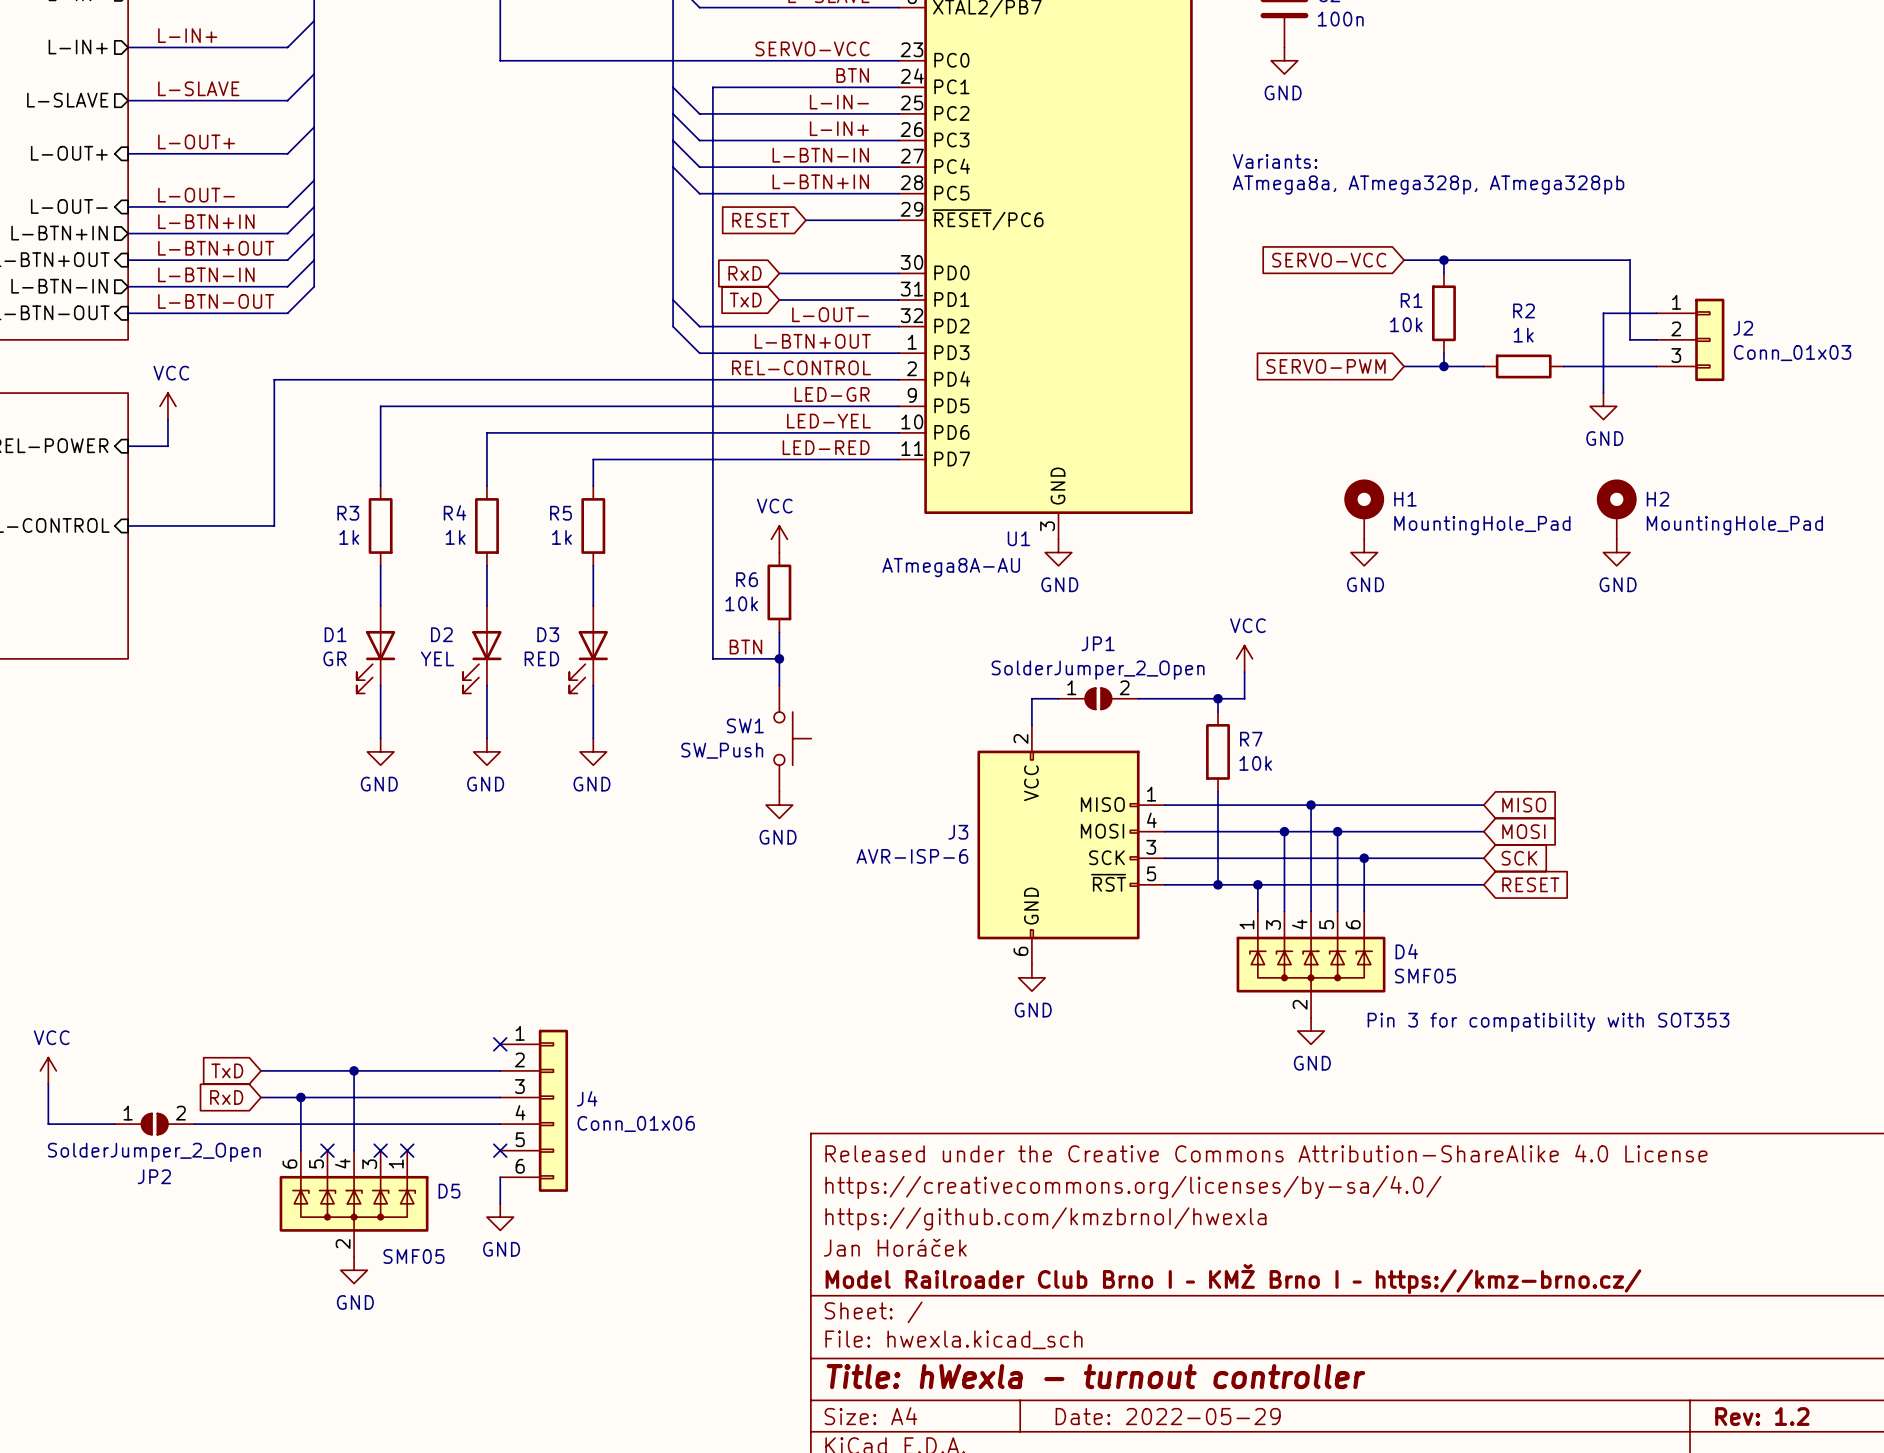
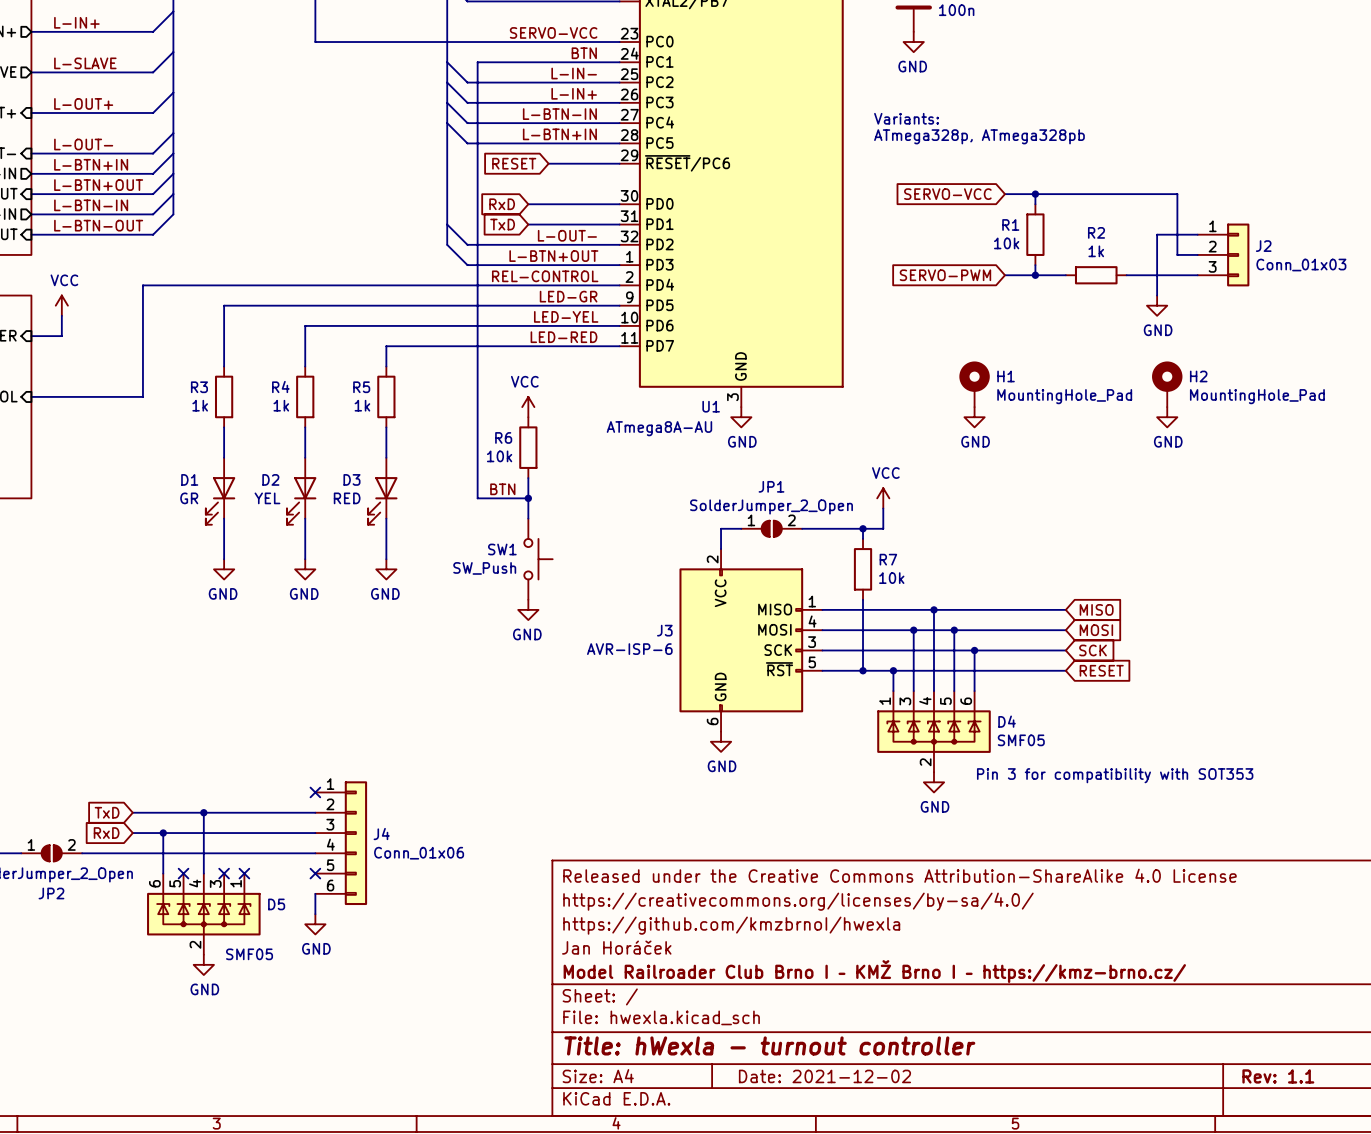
text: ATmega8a, ATmega328p, ATmega328pb (1428, 185) -> ATmega328p, ATmega328pb (979, 136)
title block: Date: 2022-05-29 (1168, 1416) -> Date: 2021-12-02 (824, 1076)
title block: Rev: 1.2 (1762, 1416) -> Rev: 1.1 (1278, 1076)

